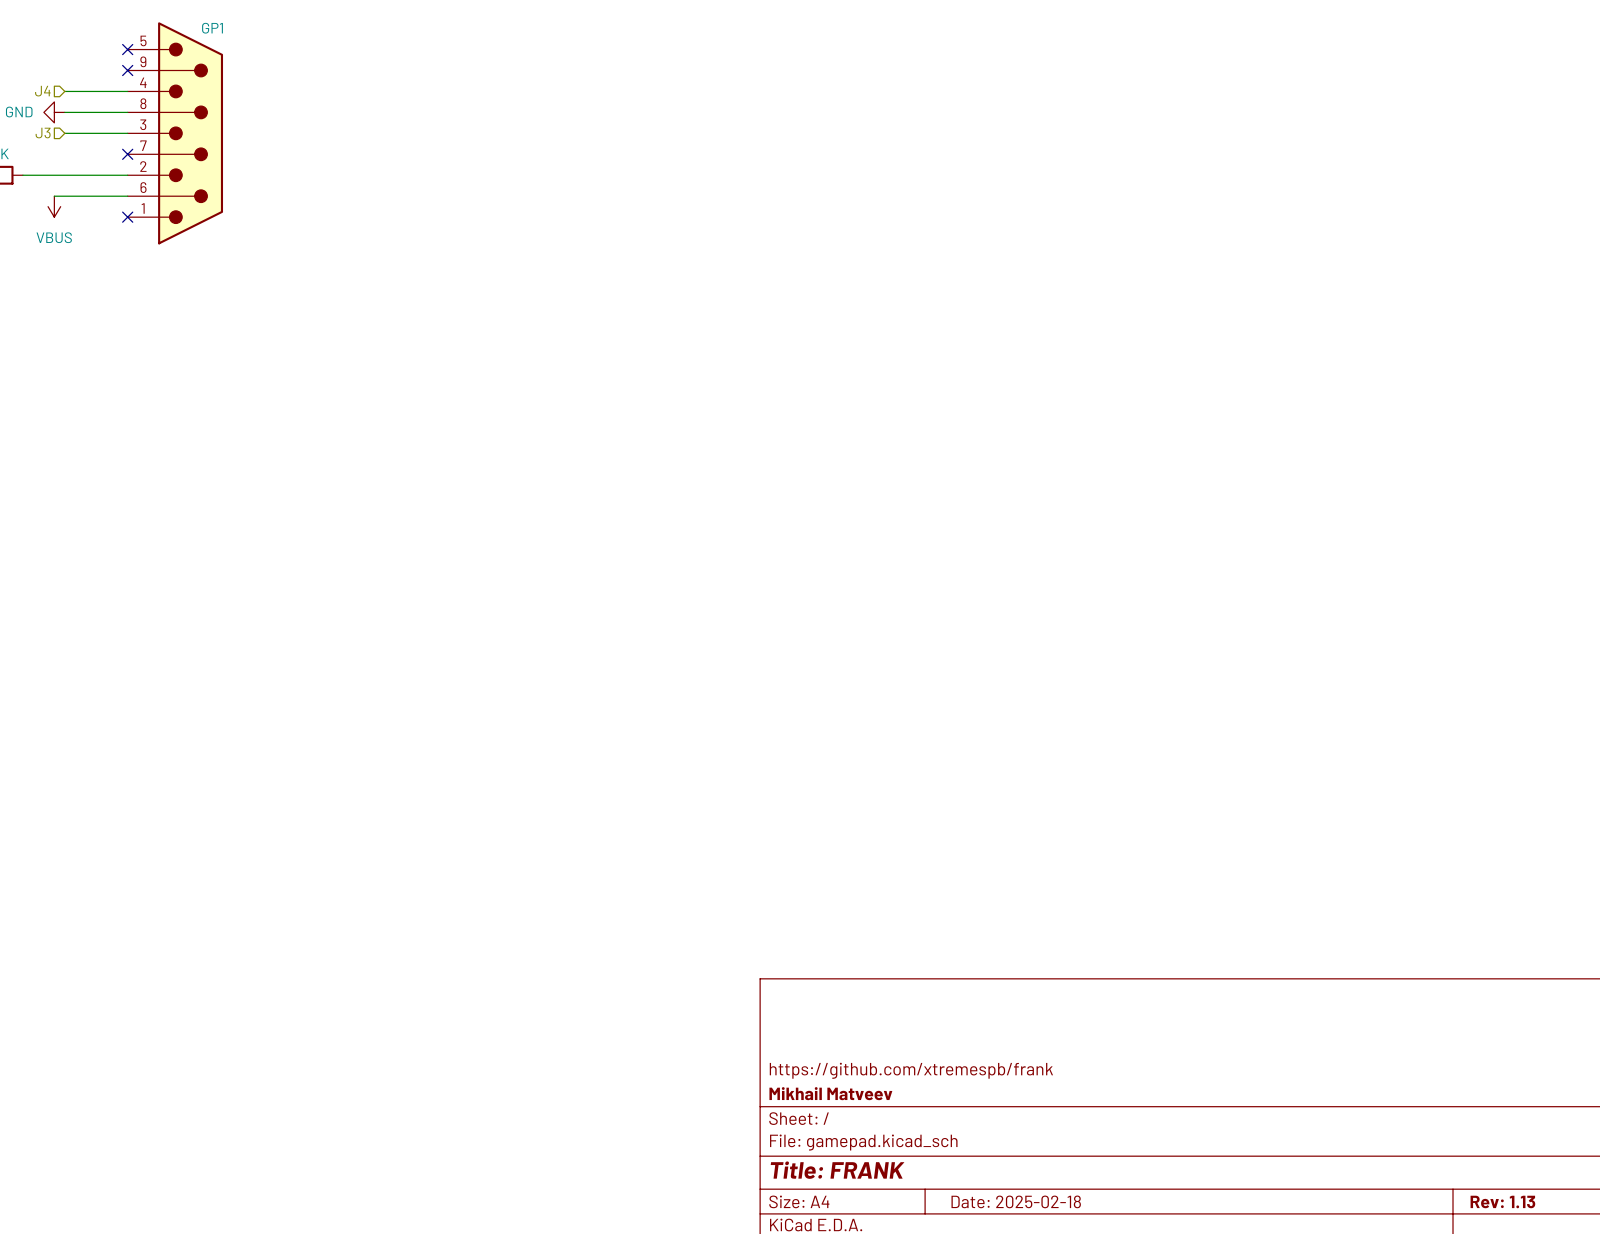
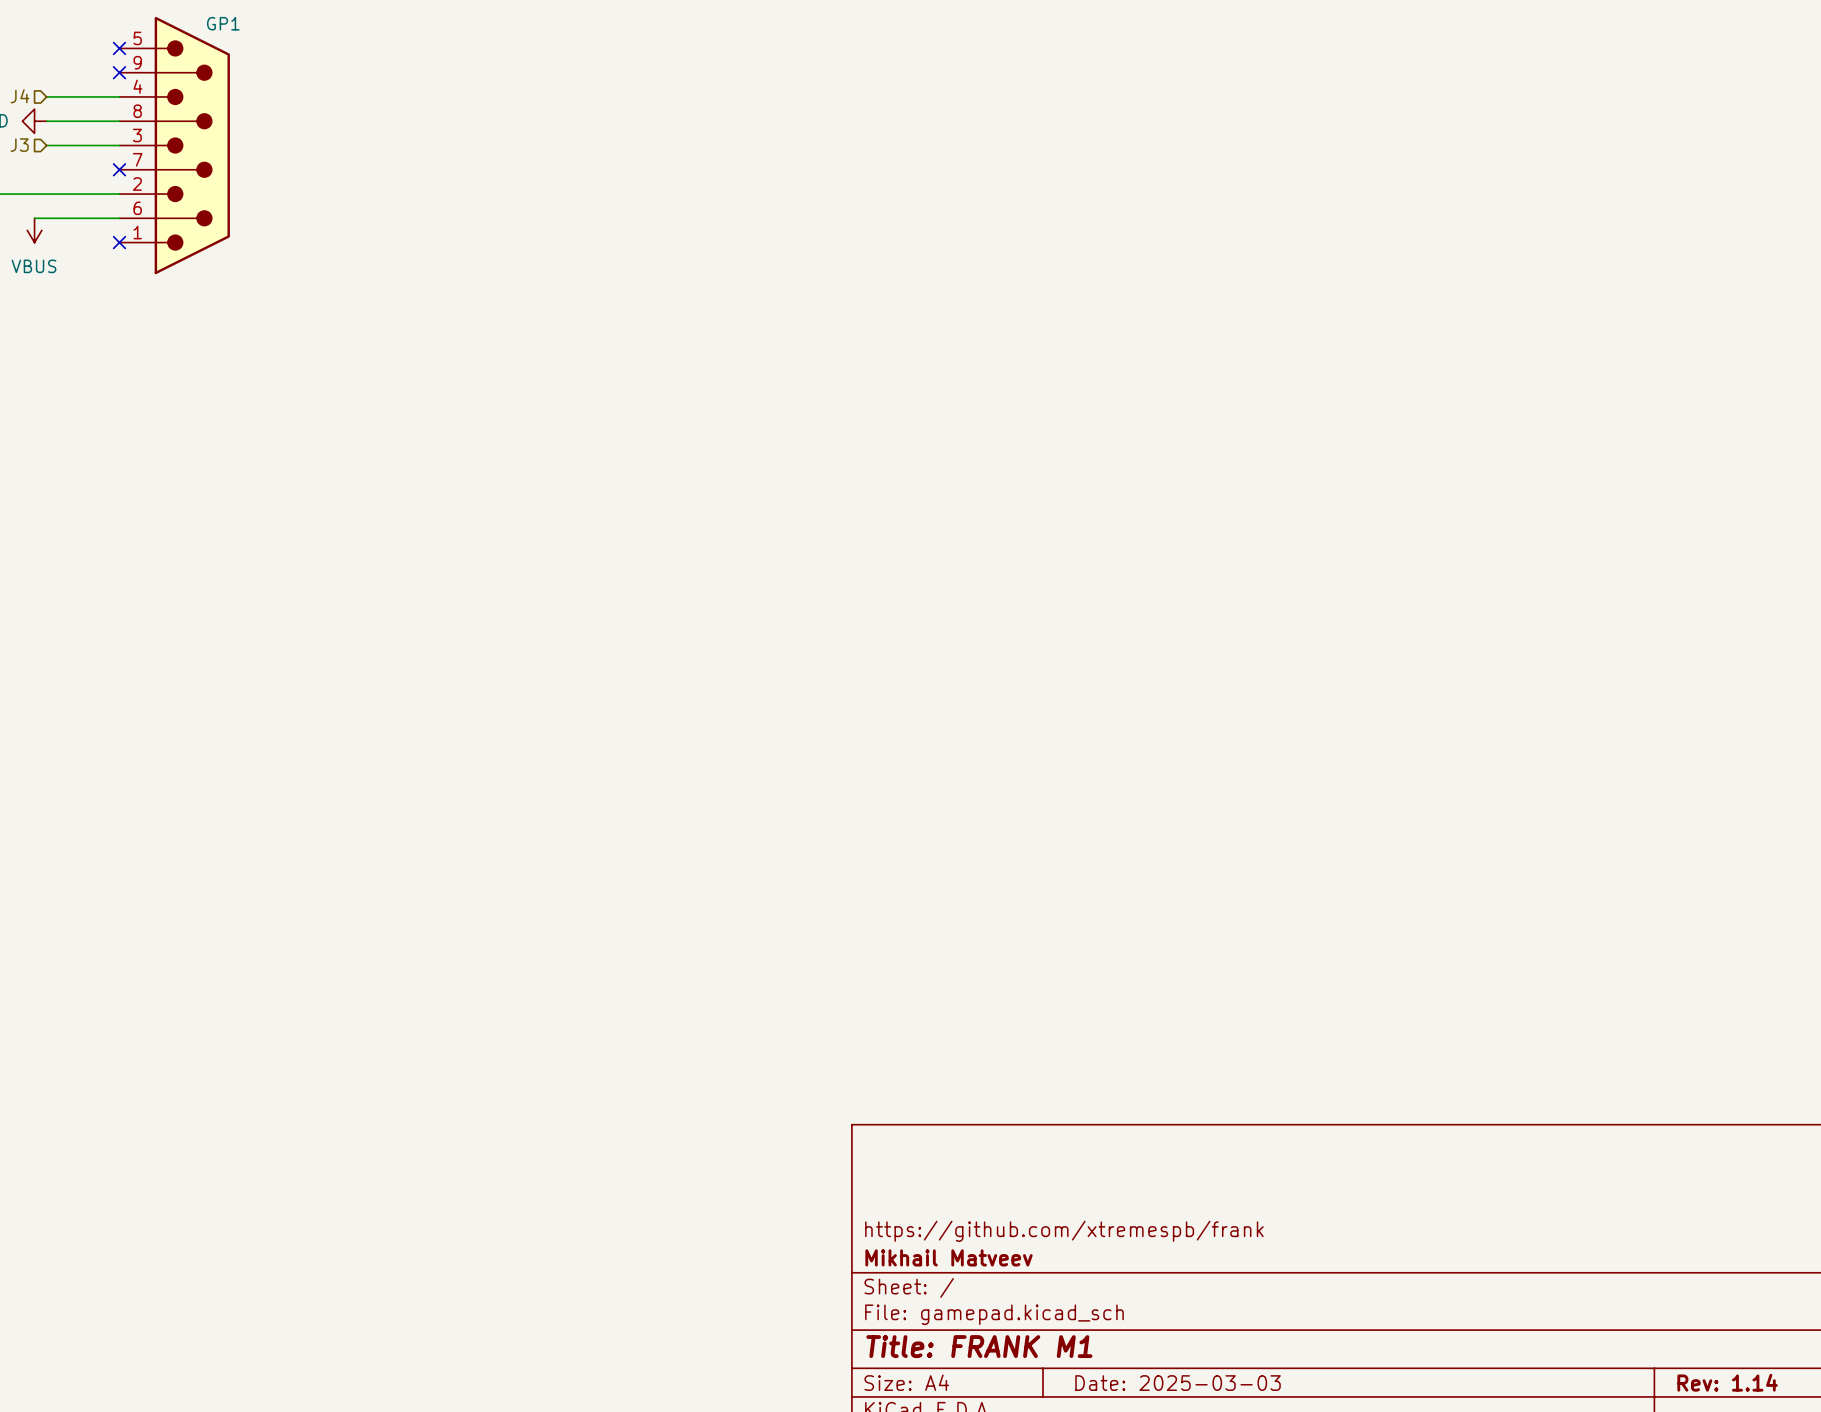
title block: Title: FRANK (837, 1170) -> Title: FRANK M1 (979, 1346)
title block: Date: 2025-02-18 (1016, 1201) -> Date: 2025-03-03 (1178, 1383)
title block: Rev: 1.13 (1502, 1201) -> Rev: 1.14 (1727, 1382)

